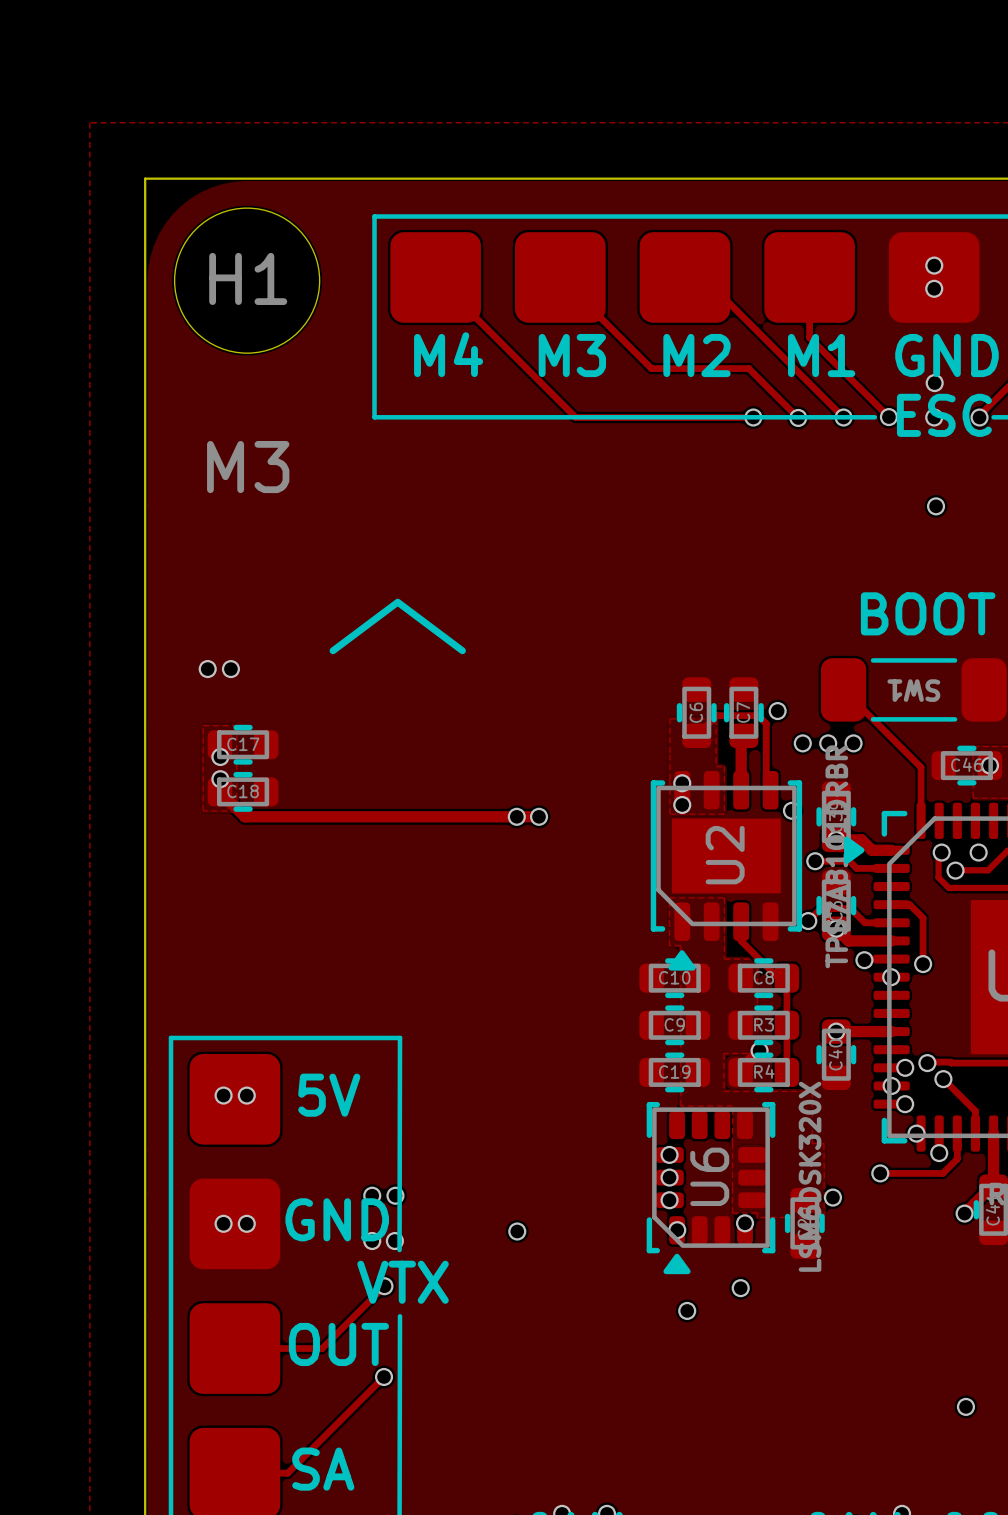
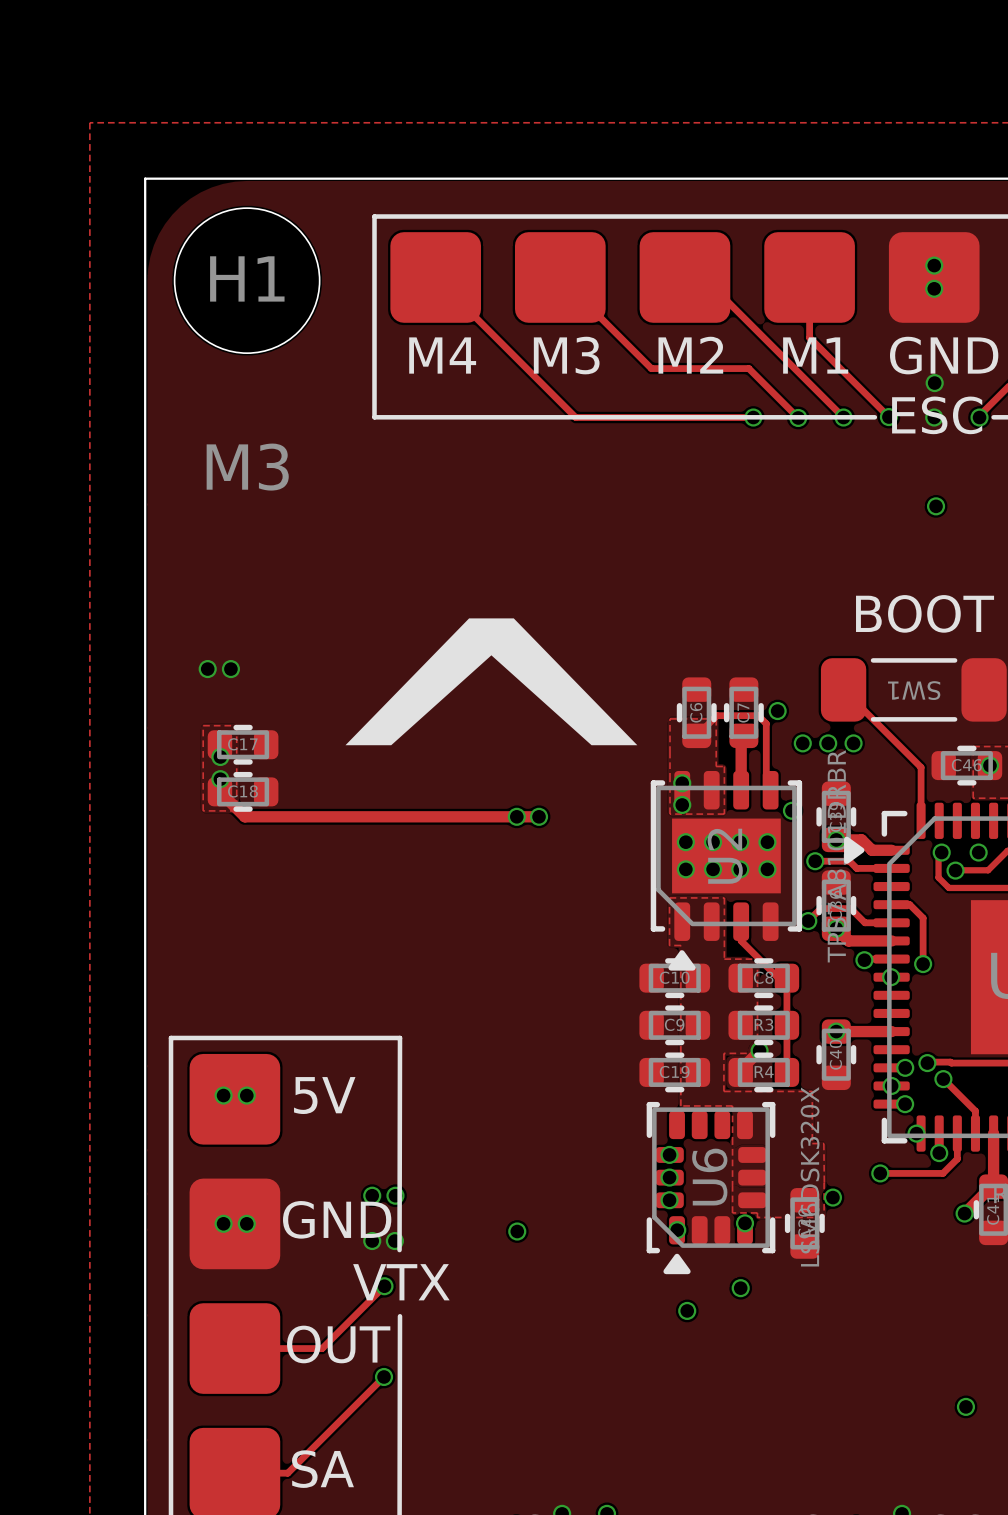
via: none -> (685, 842)
via: none -> (713, 842)
via: none -> (740, 842)
via: none -> (767, 842)
via: none -> (685, 869)
via: none -> (713, 869)
via: none -> (740, 869)
via: none -> (767, 869)

